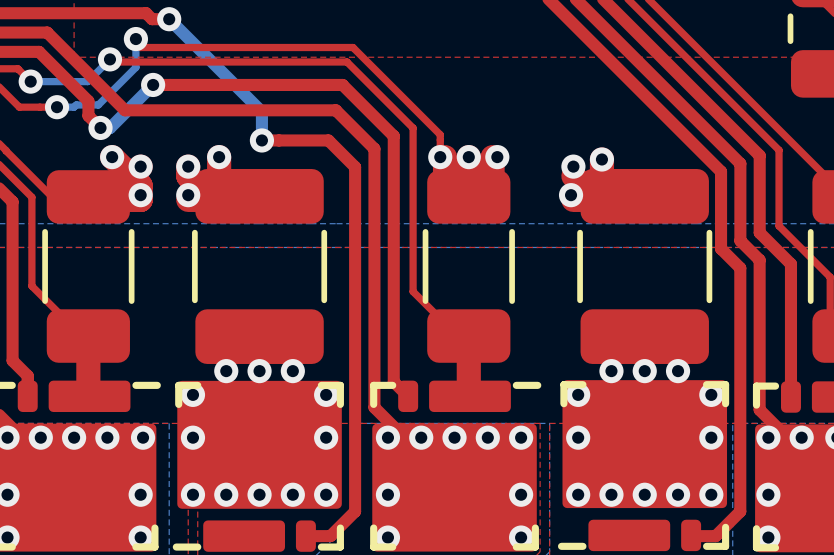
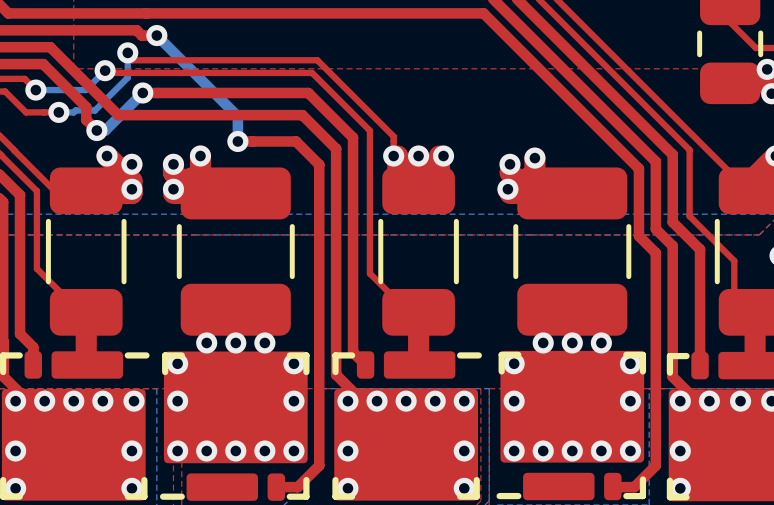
part footprint: [192, 169, 328, 364] -> [176, 167, 295, 336]
part footprint: [577, 169, 713, 364] -> [513, 167, 632, 336]

